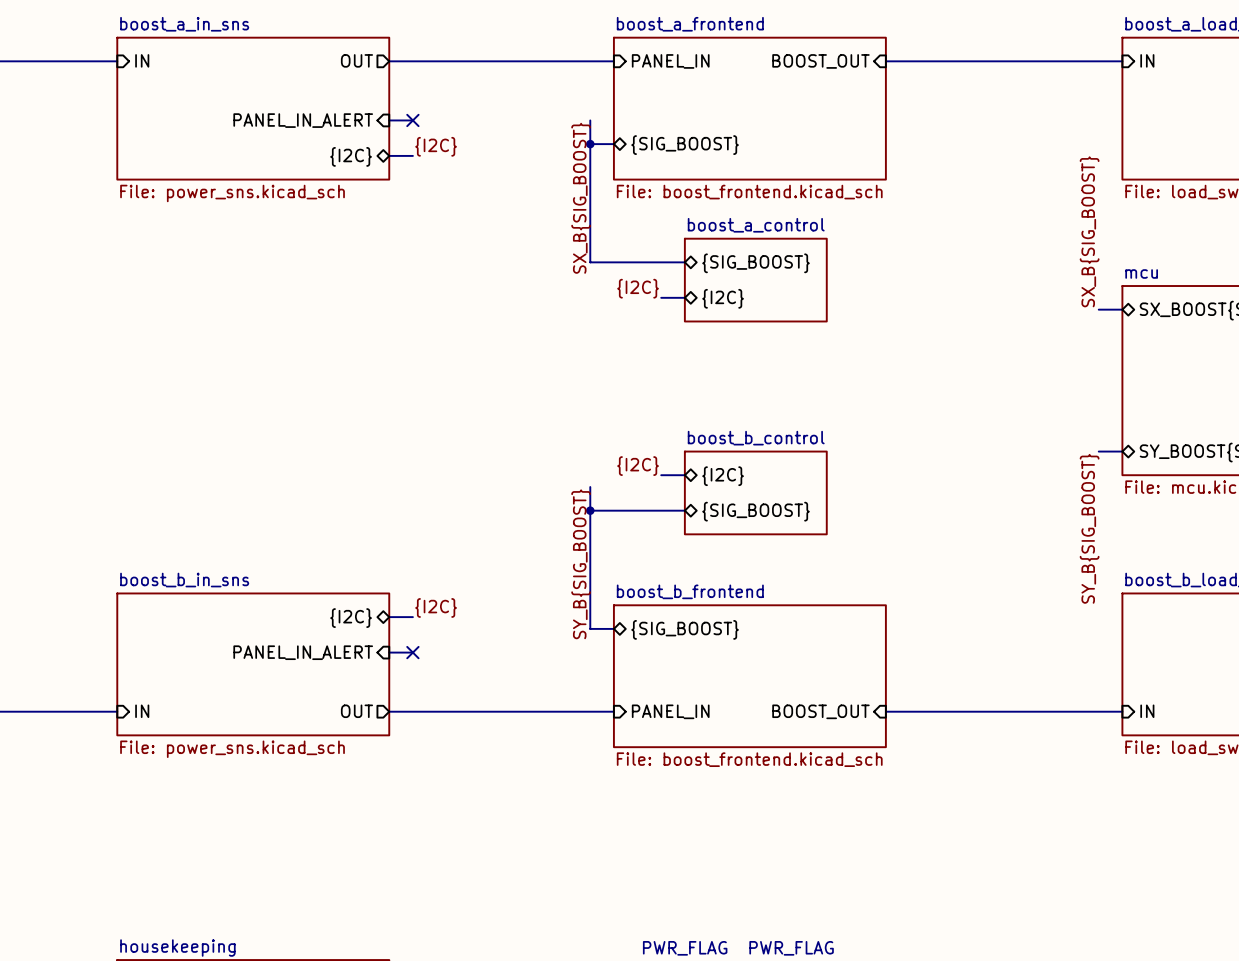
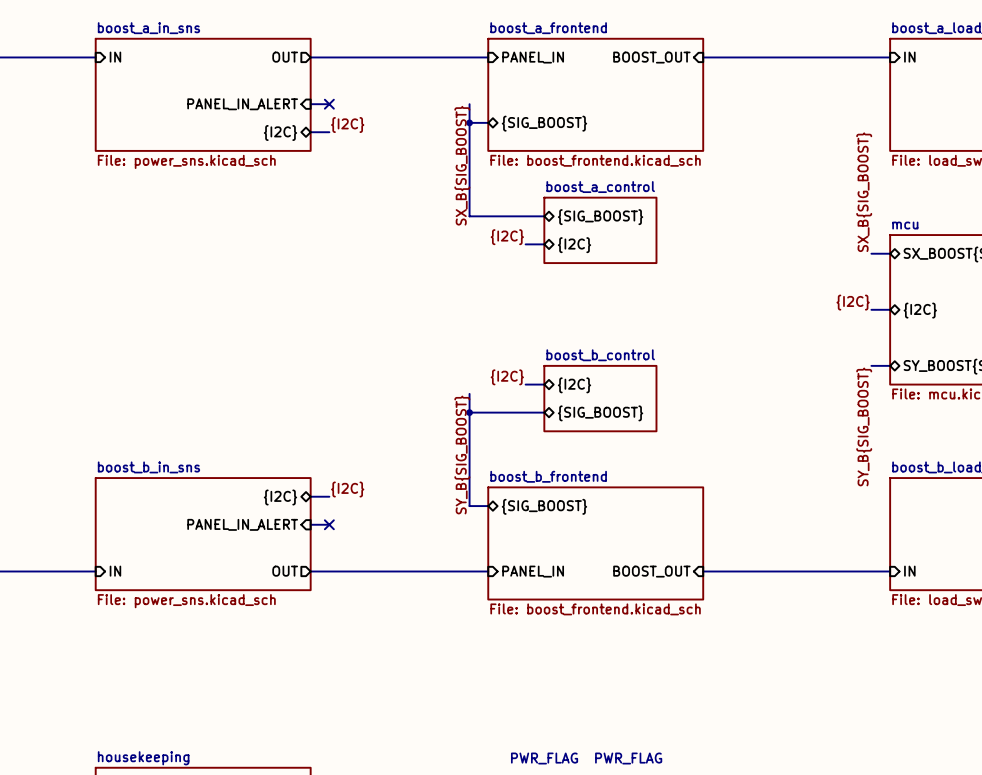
label: none -> {I2C} (853, 302)
bus: none -> (871, 309) (890, 309)
sheet pin: none -> {I2C} (920, 310)

